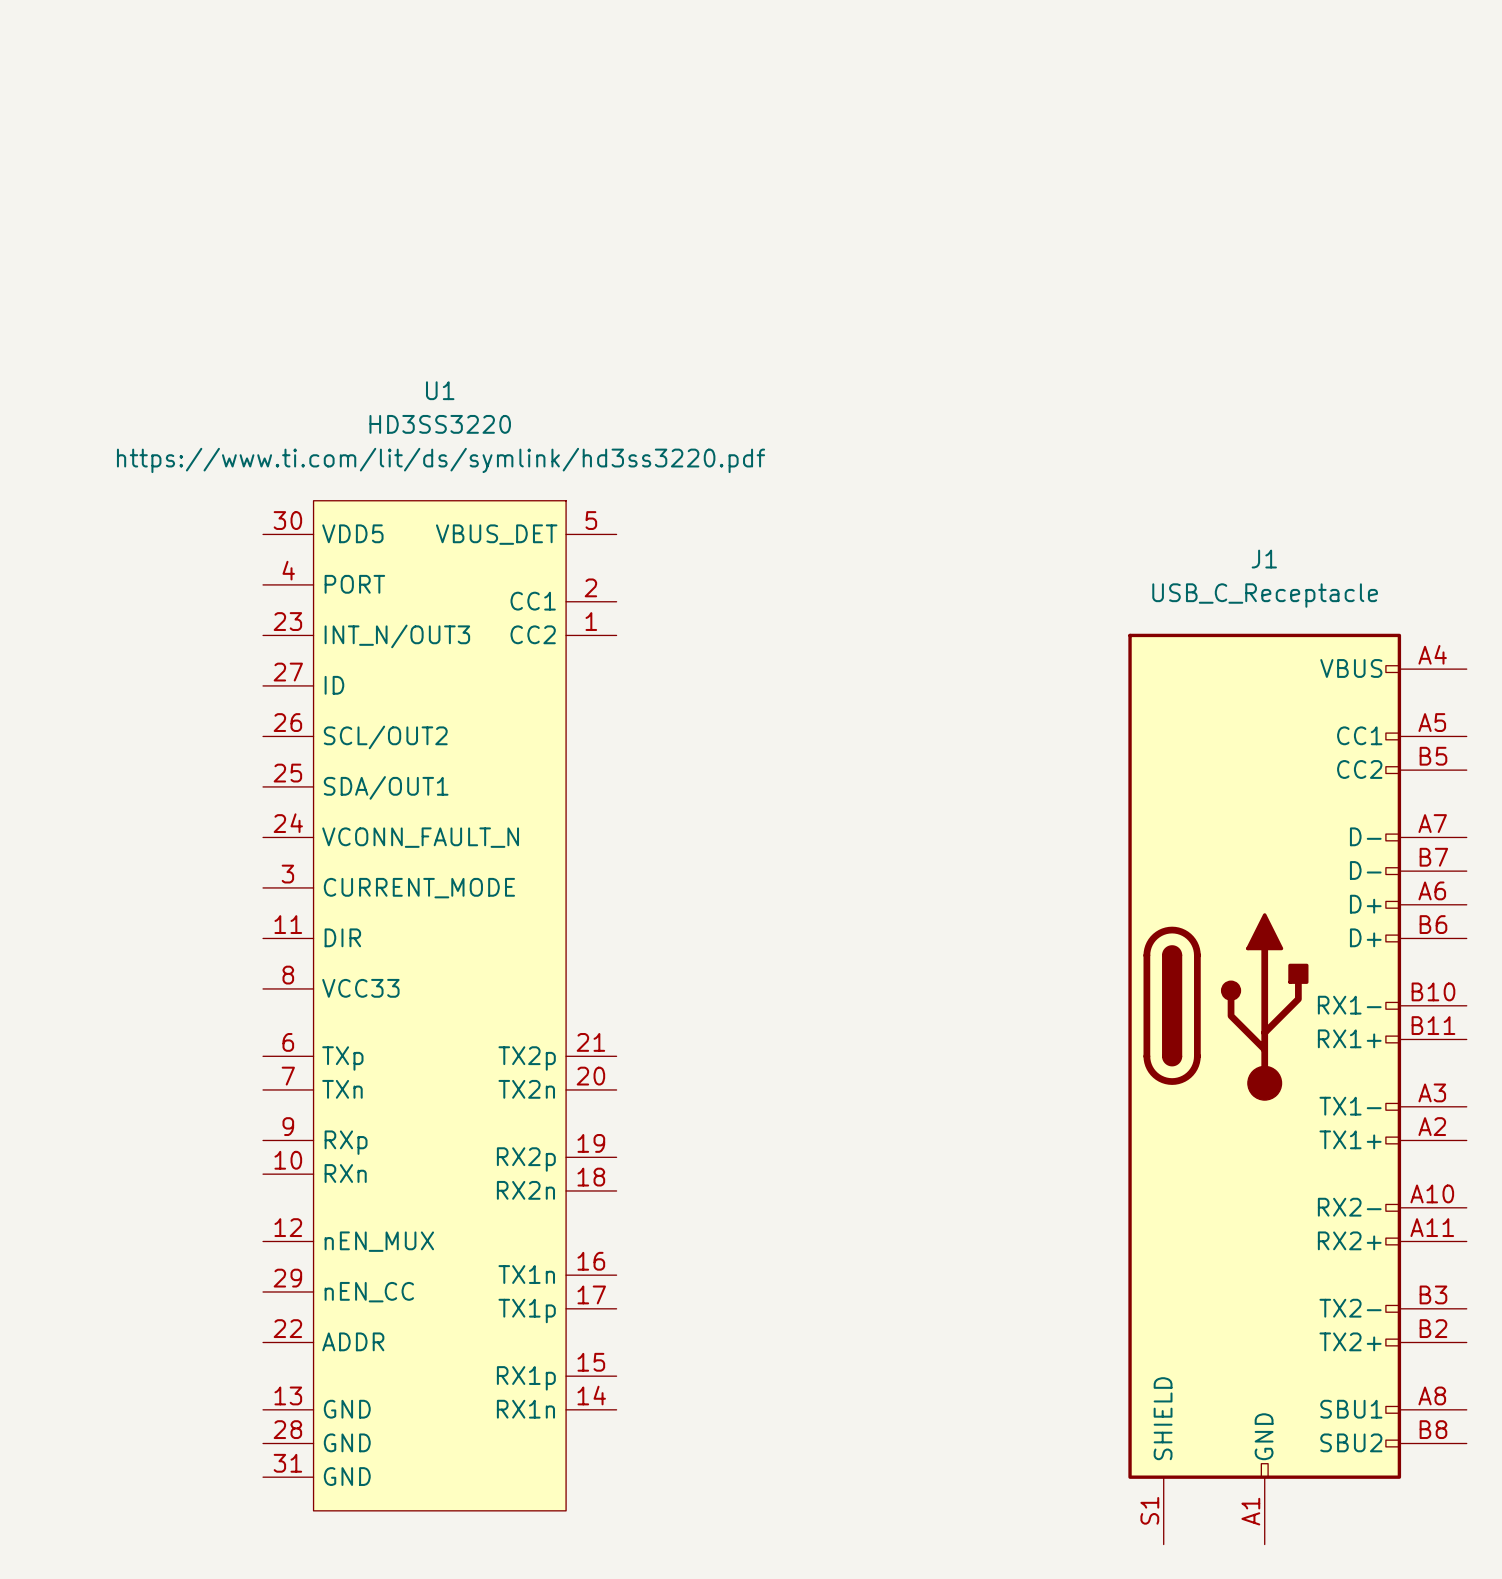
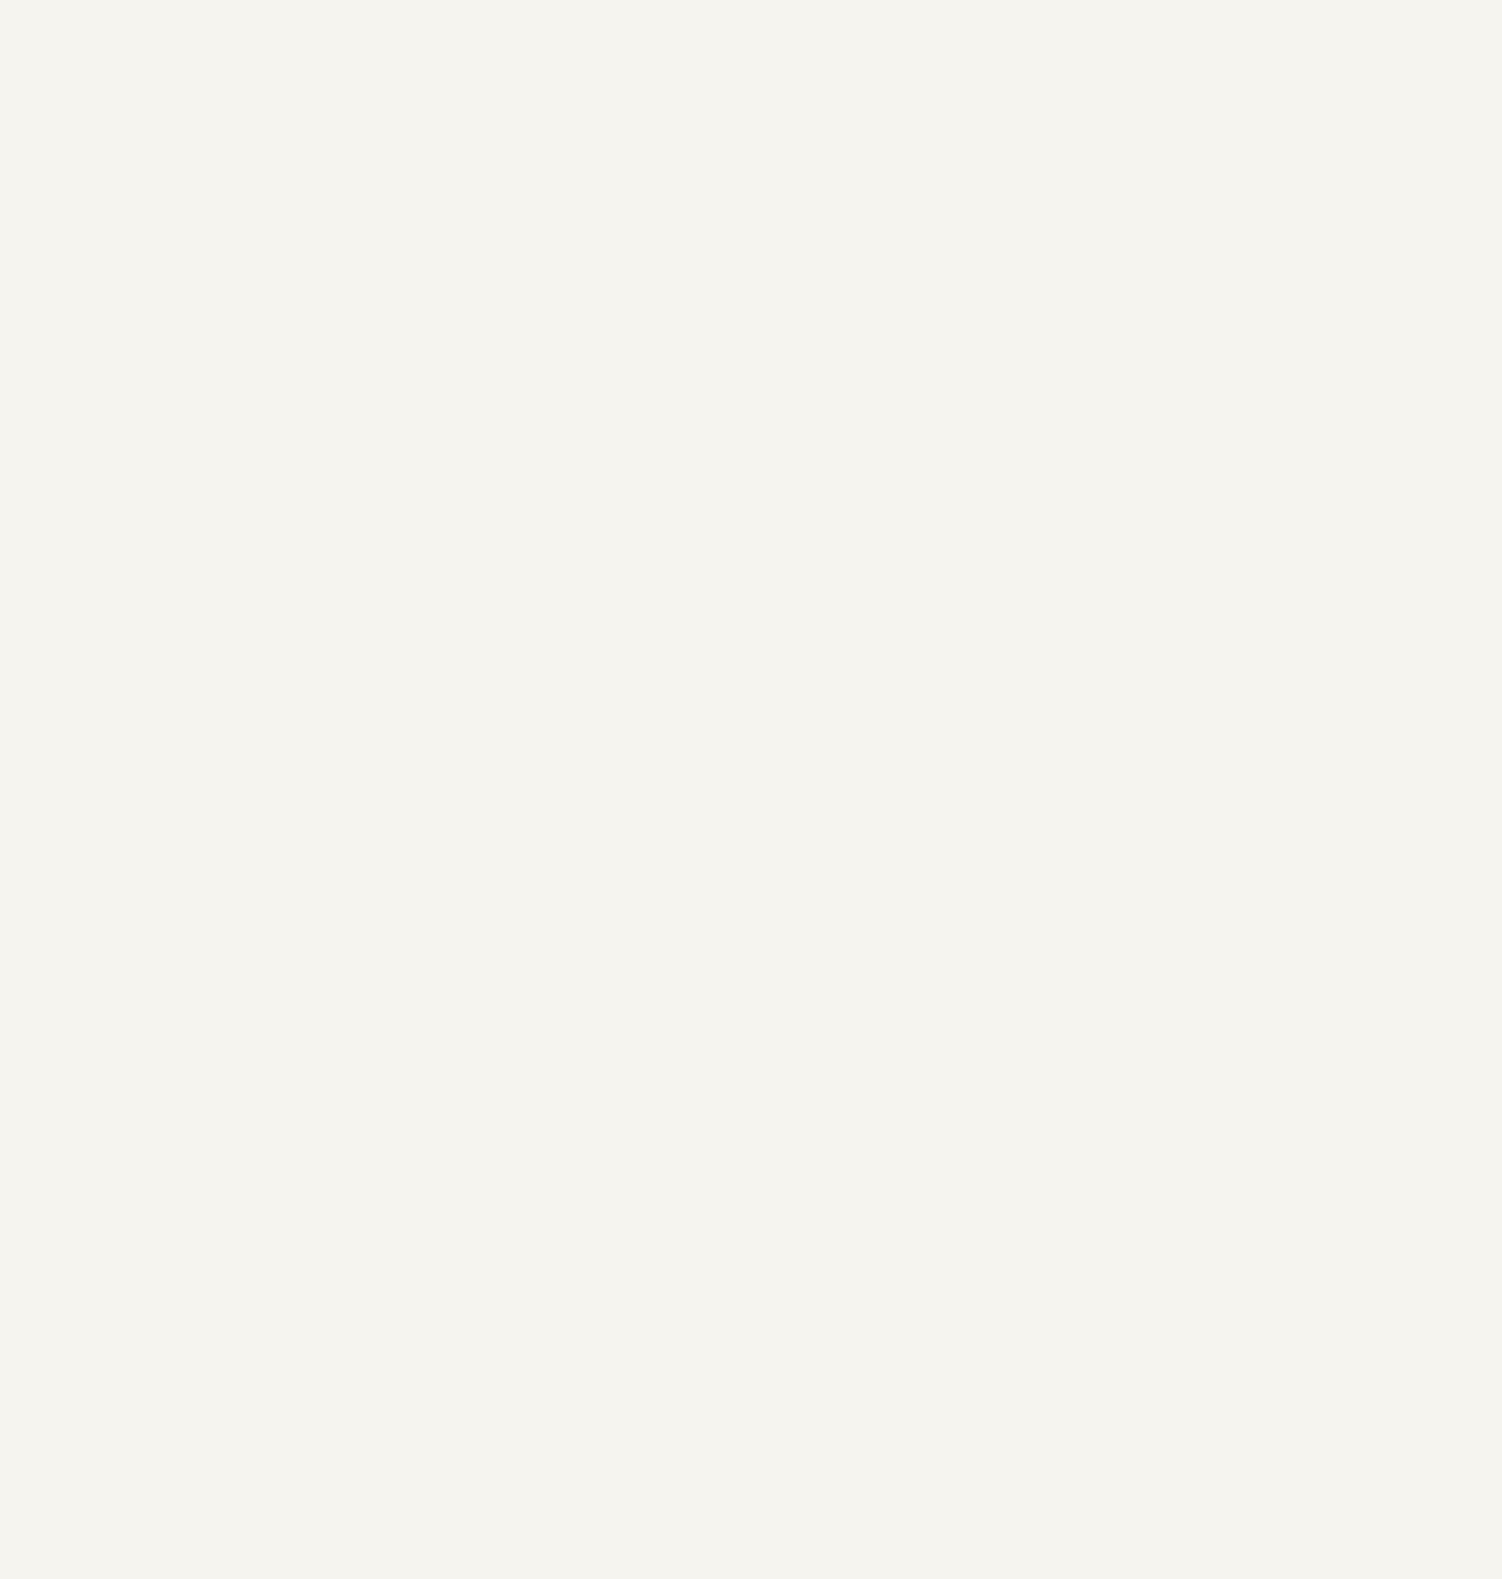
U1: HD3SS3220 (439, 1005) -> none
J1: USB_C_Receptacle (1297, 1089) -> none

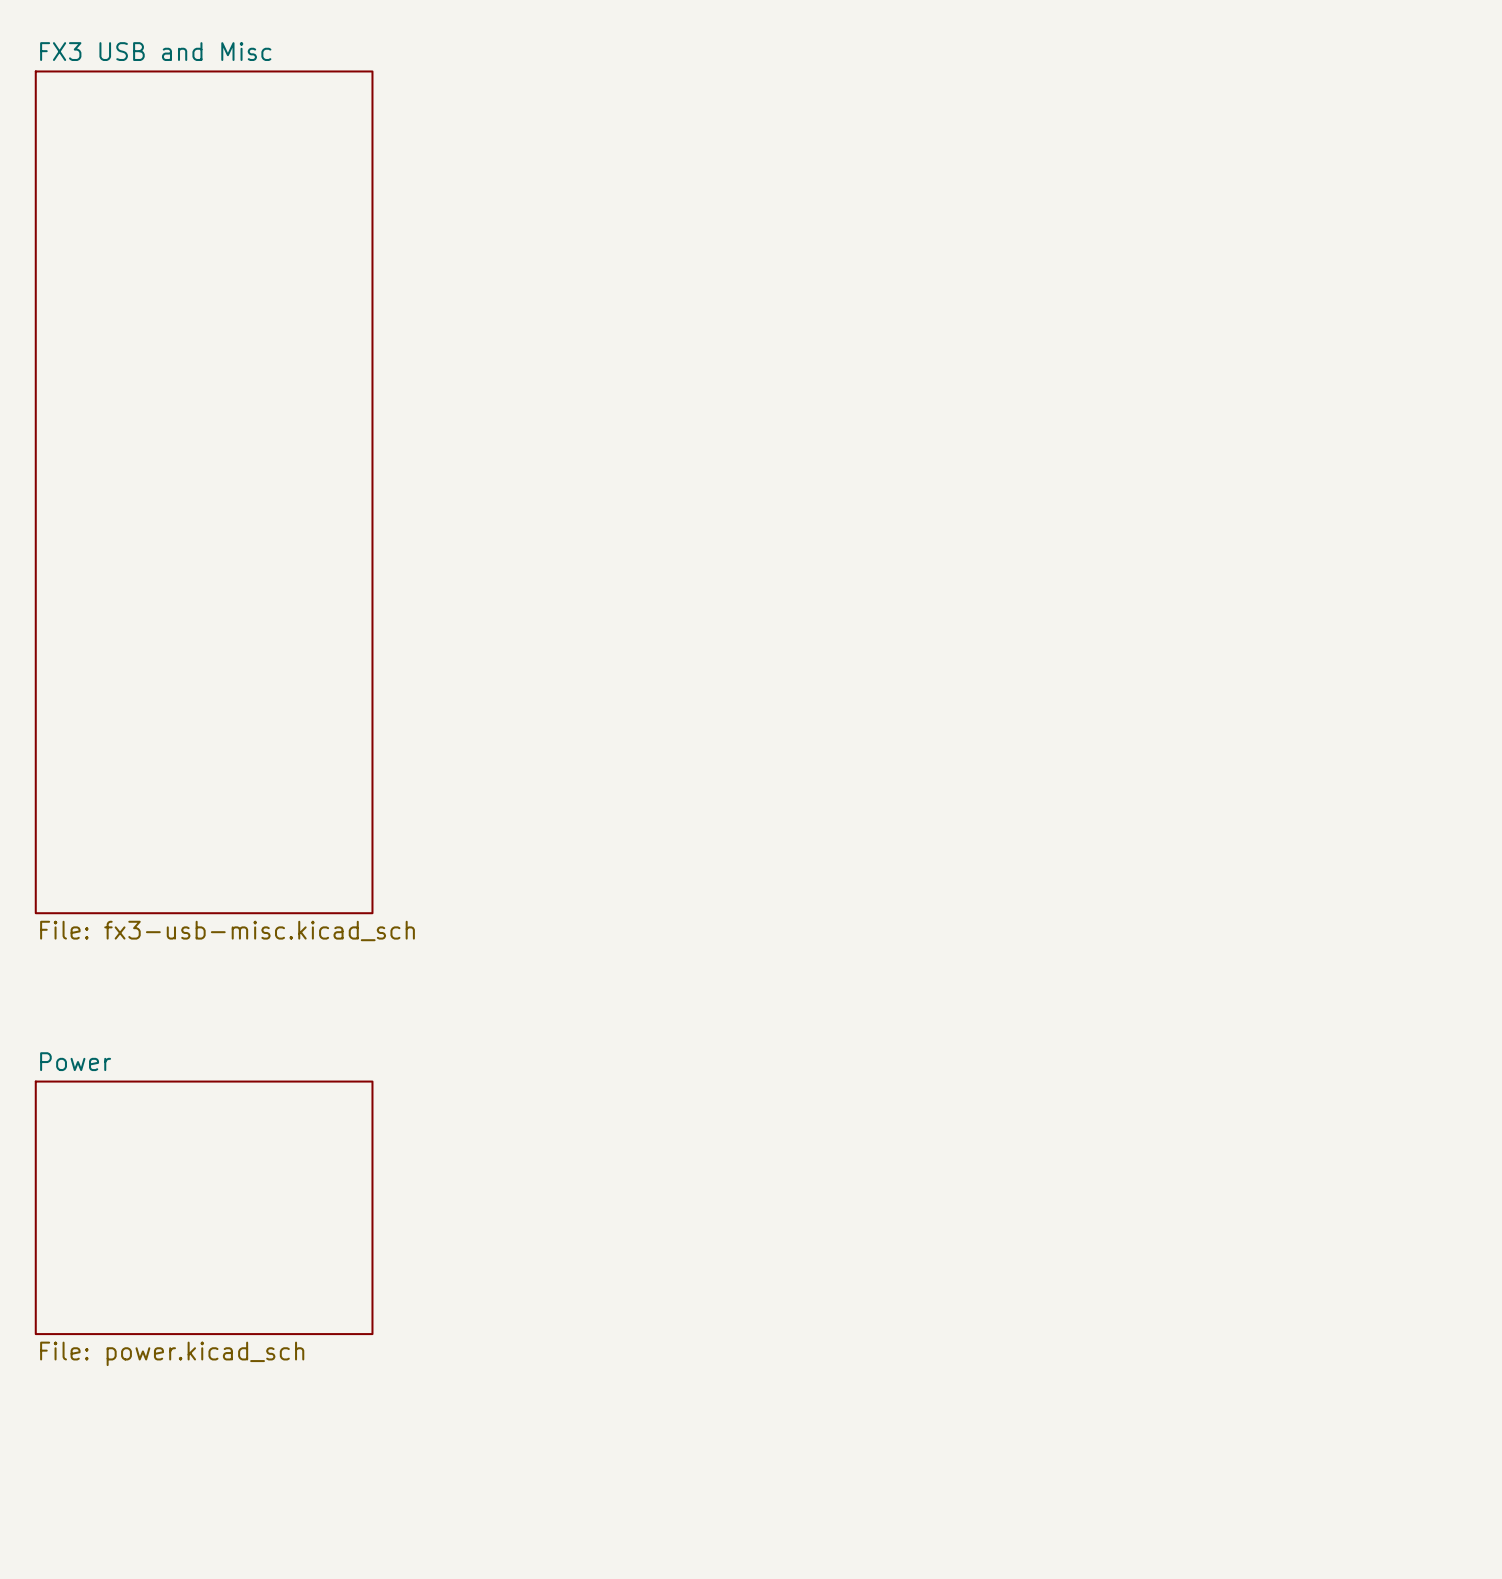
sheet FX3 USB and Misc: none -> File: fx3-usb-misc.kicad_sch (204, 492)
sheet Power: none -> File: power.kicad_sch (204, 1207)

